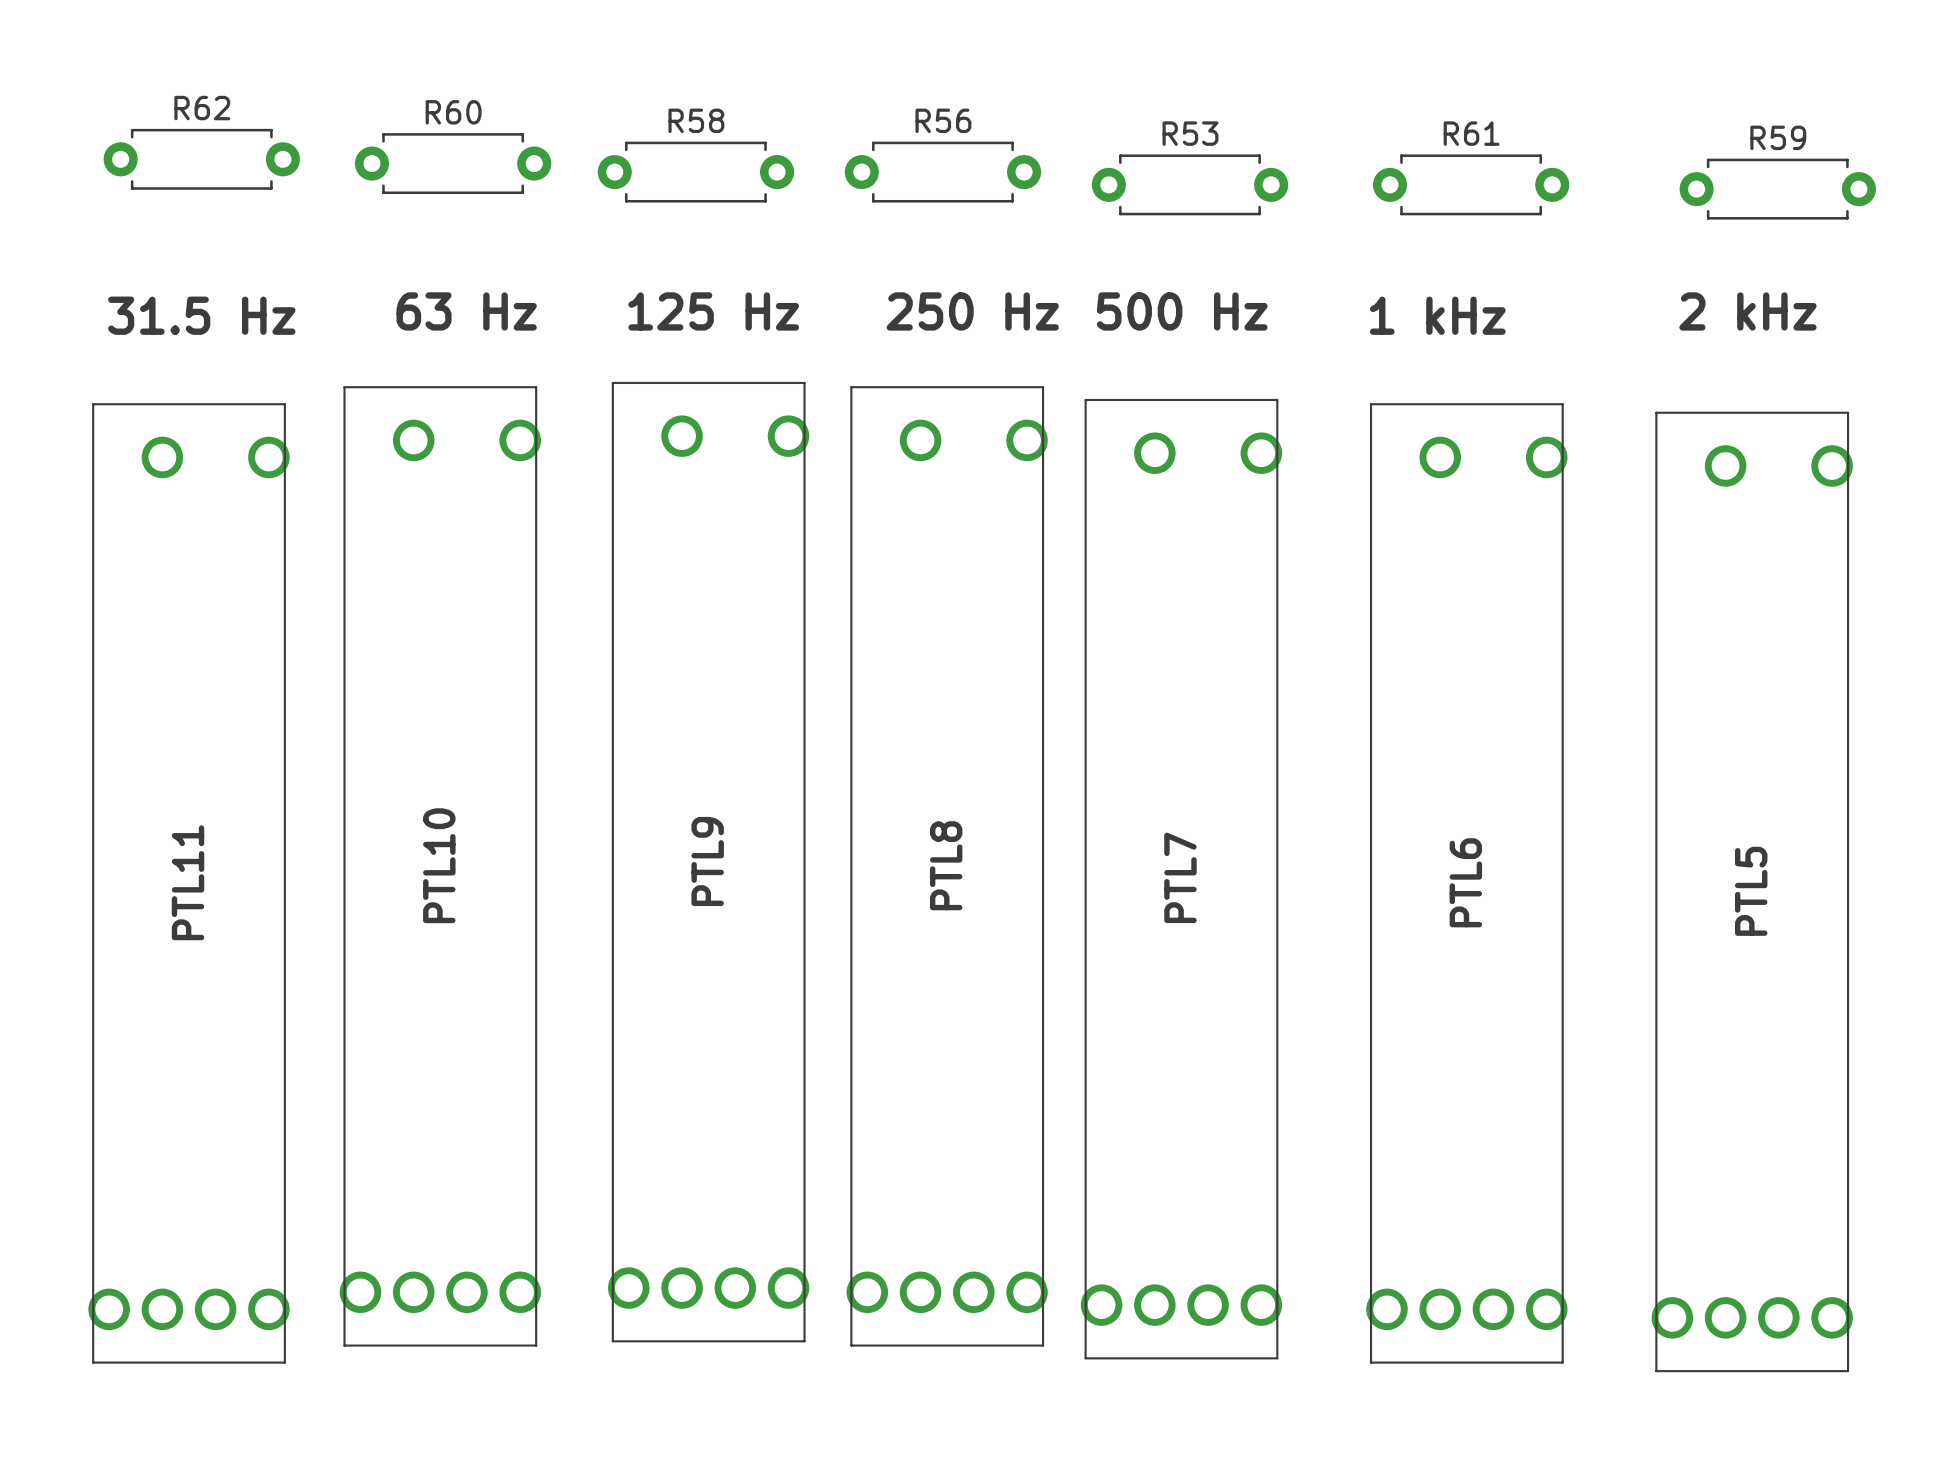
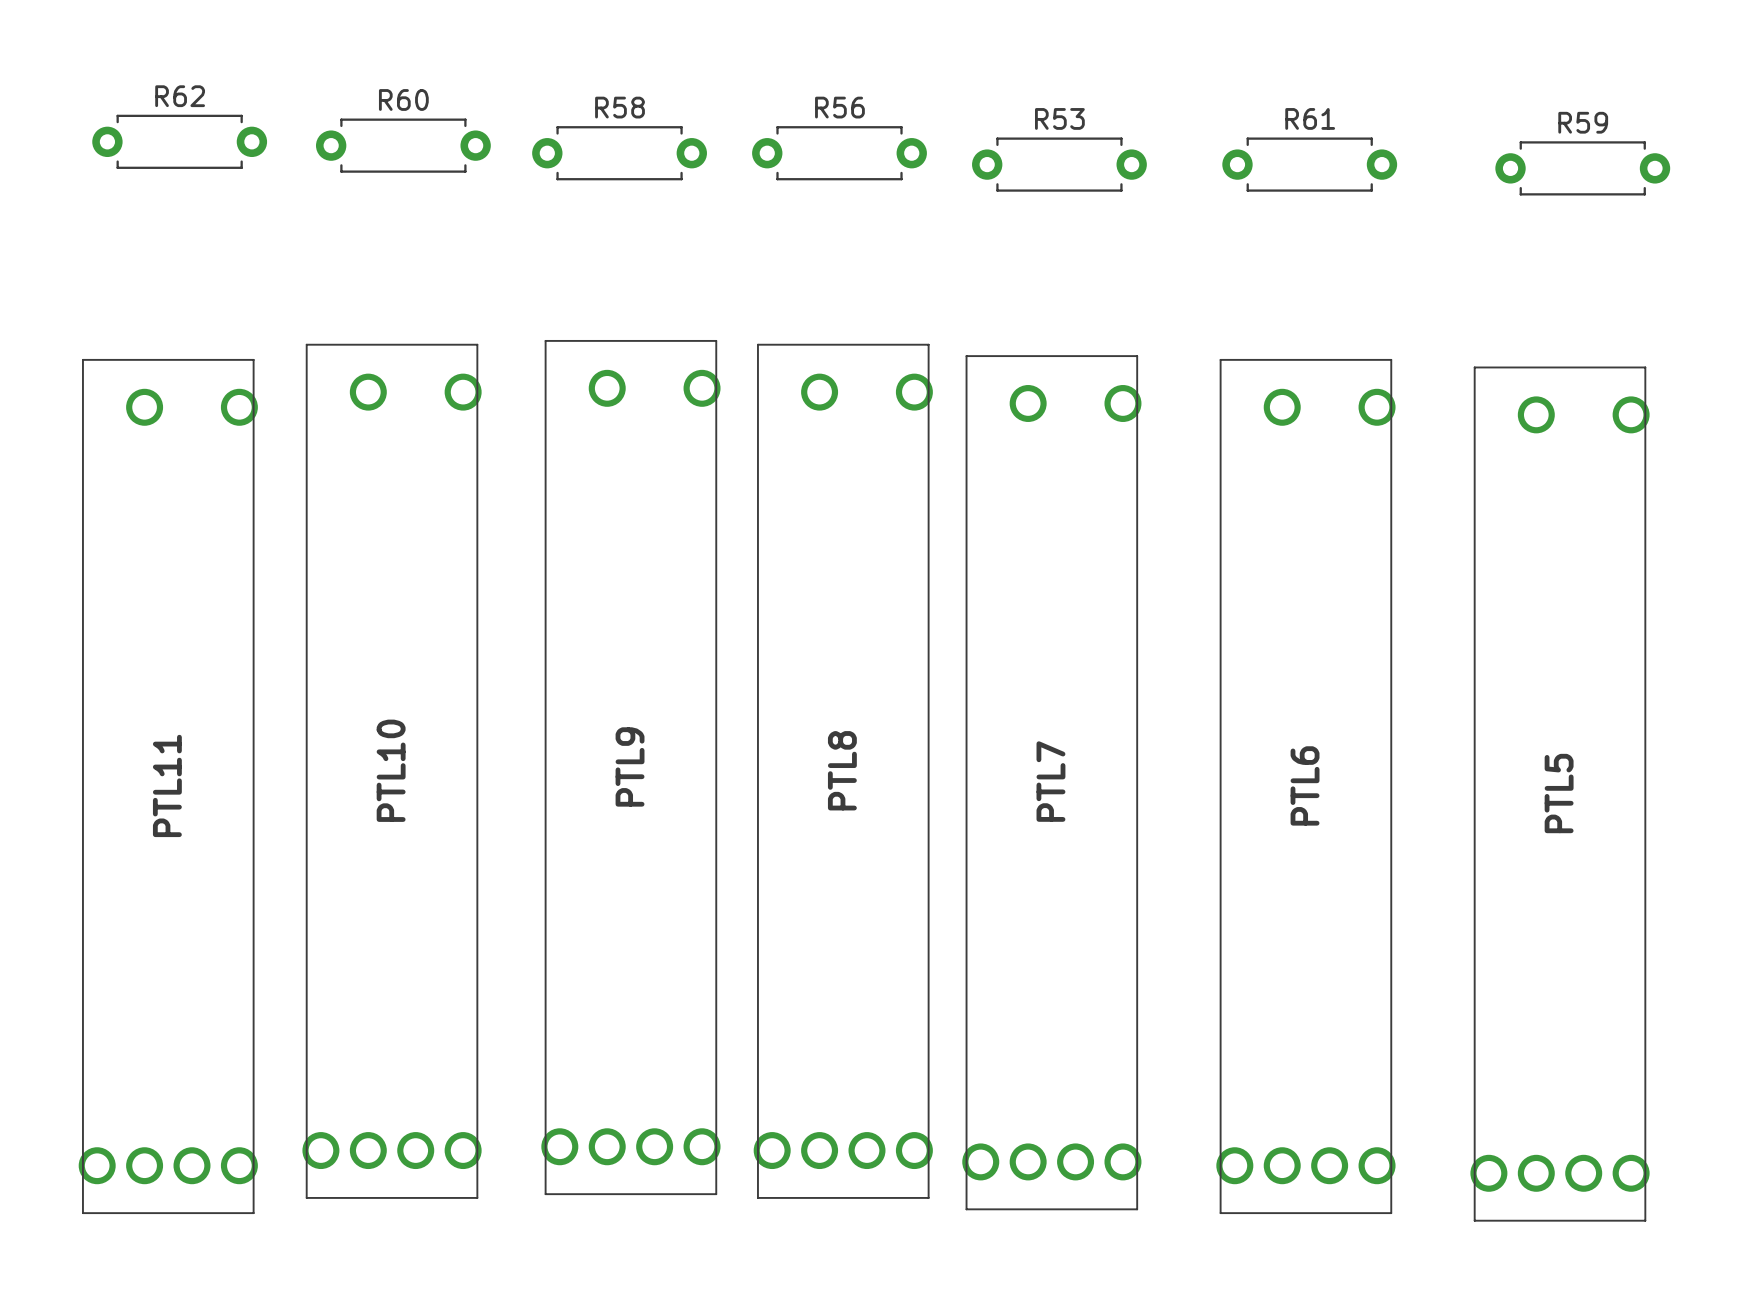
text: 63 Hz (466, 311) -> none
text: 125 Hz (713, 311) -> none
text: 250 Hz (972, 311) -> none
text: 500 Hz (1182, 311) -> none
text: 2 kHz (1747, 311) -> none
text: 31.5 Hz (201, 315) -> none
text: 1 kHz (1437, 315) -> none

